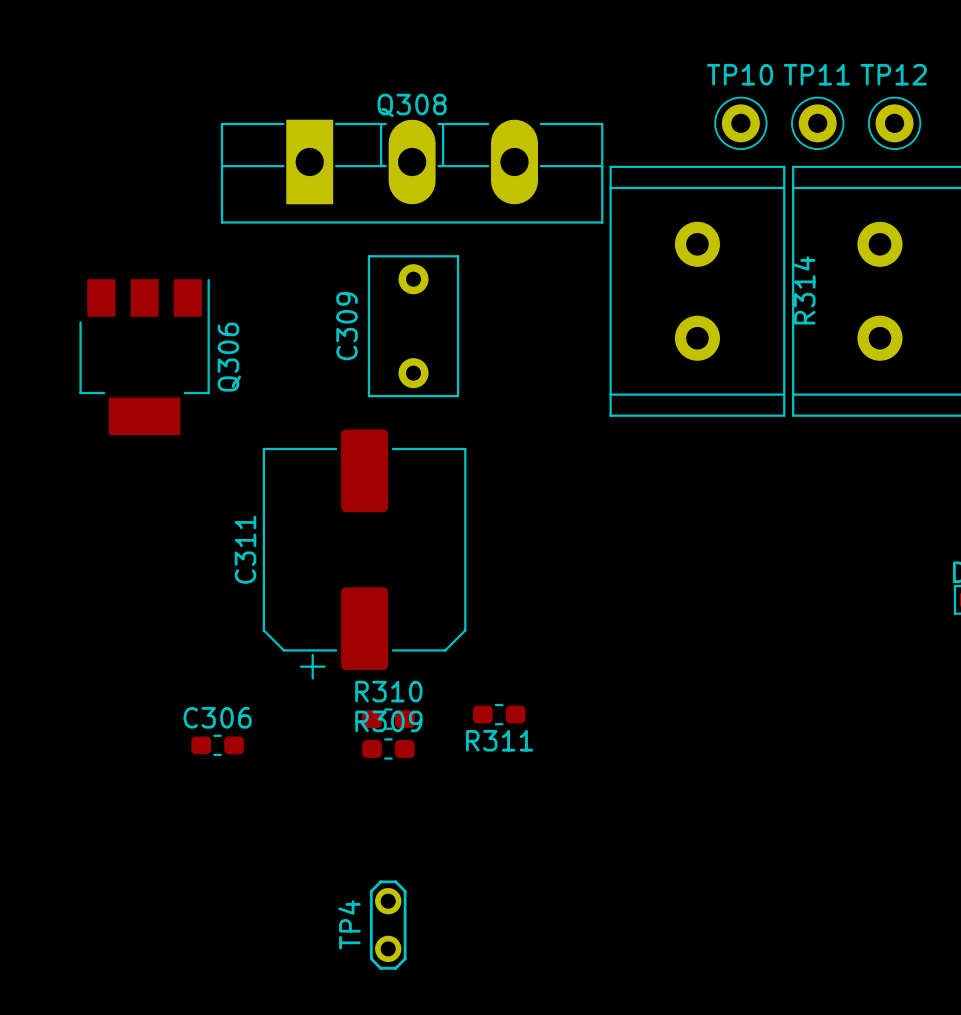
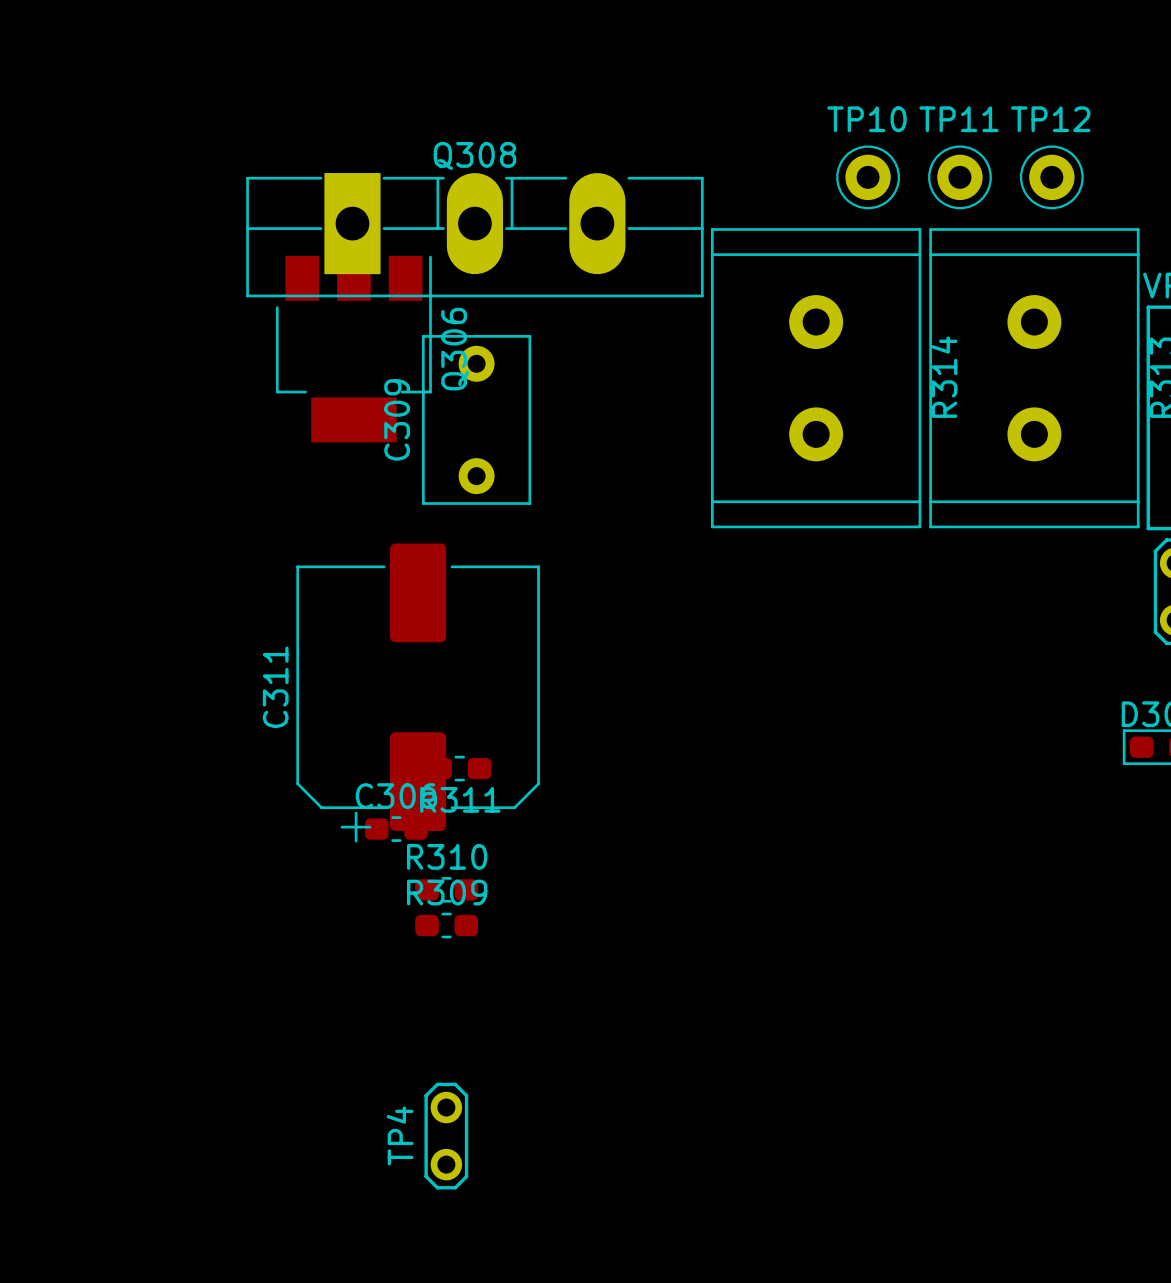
Q306 position: (144, 357) -> (353, 349)
R311 position: (499, 714) -> (459, 768)
C306 position: (217, 745) -> (396, 829)

